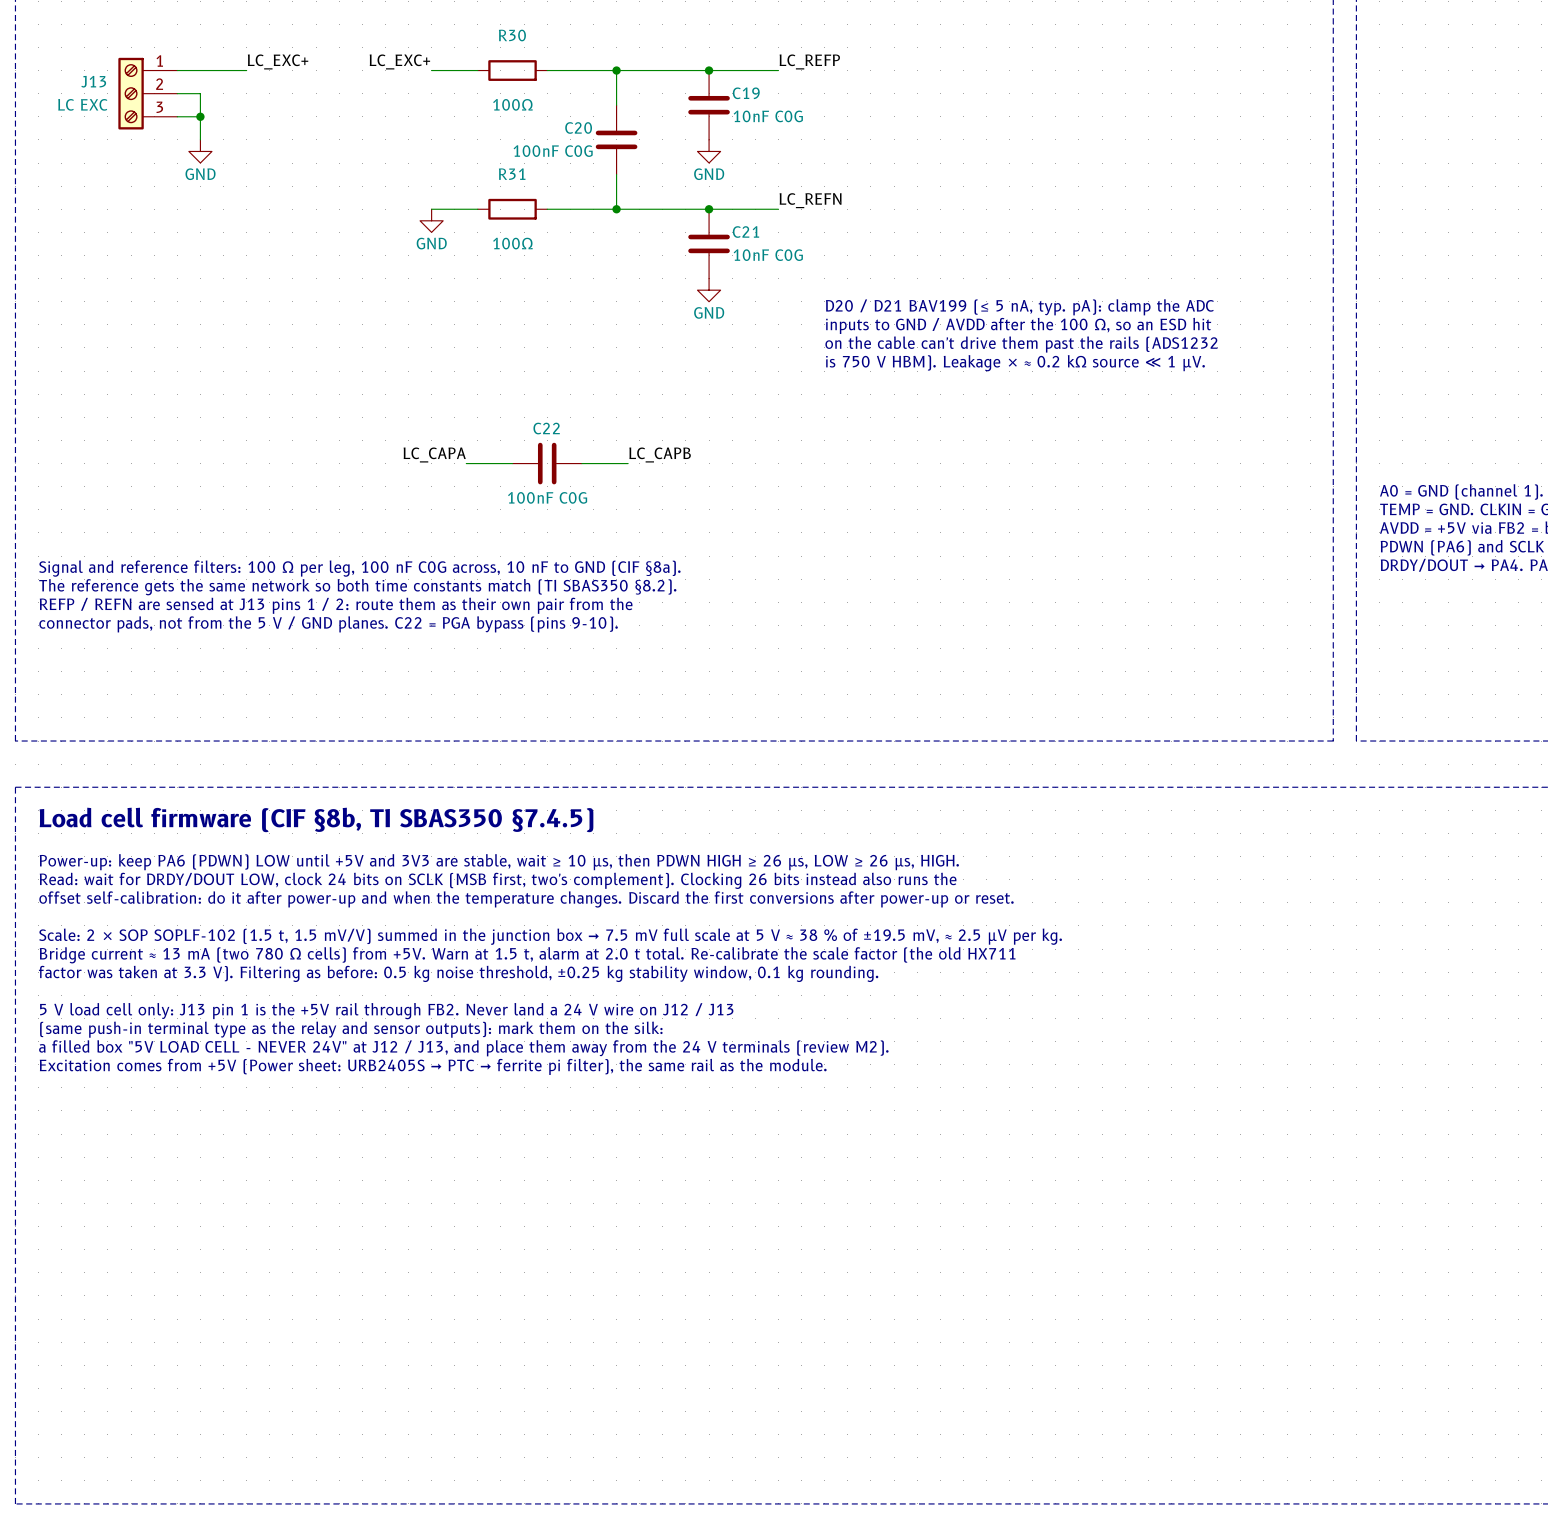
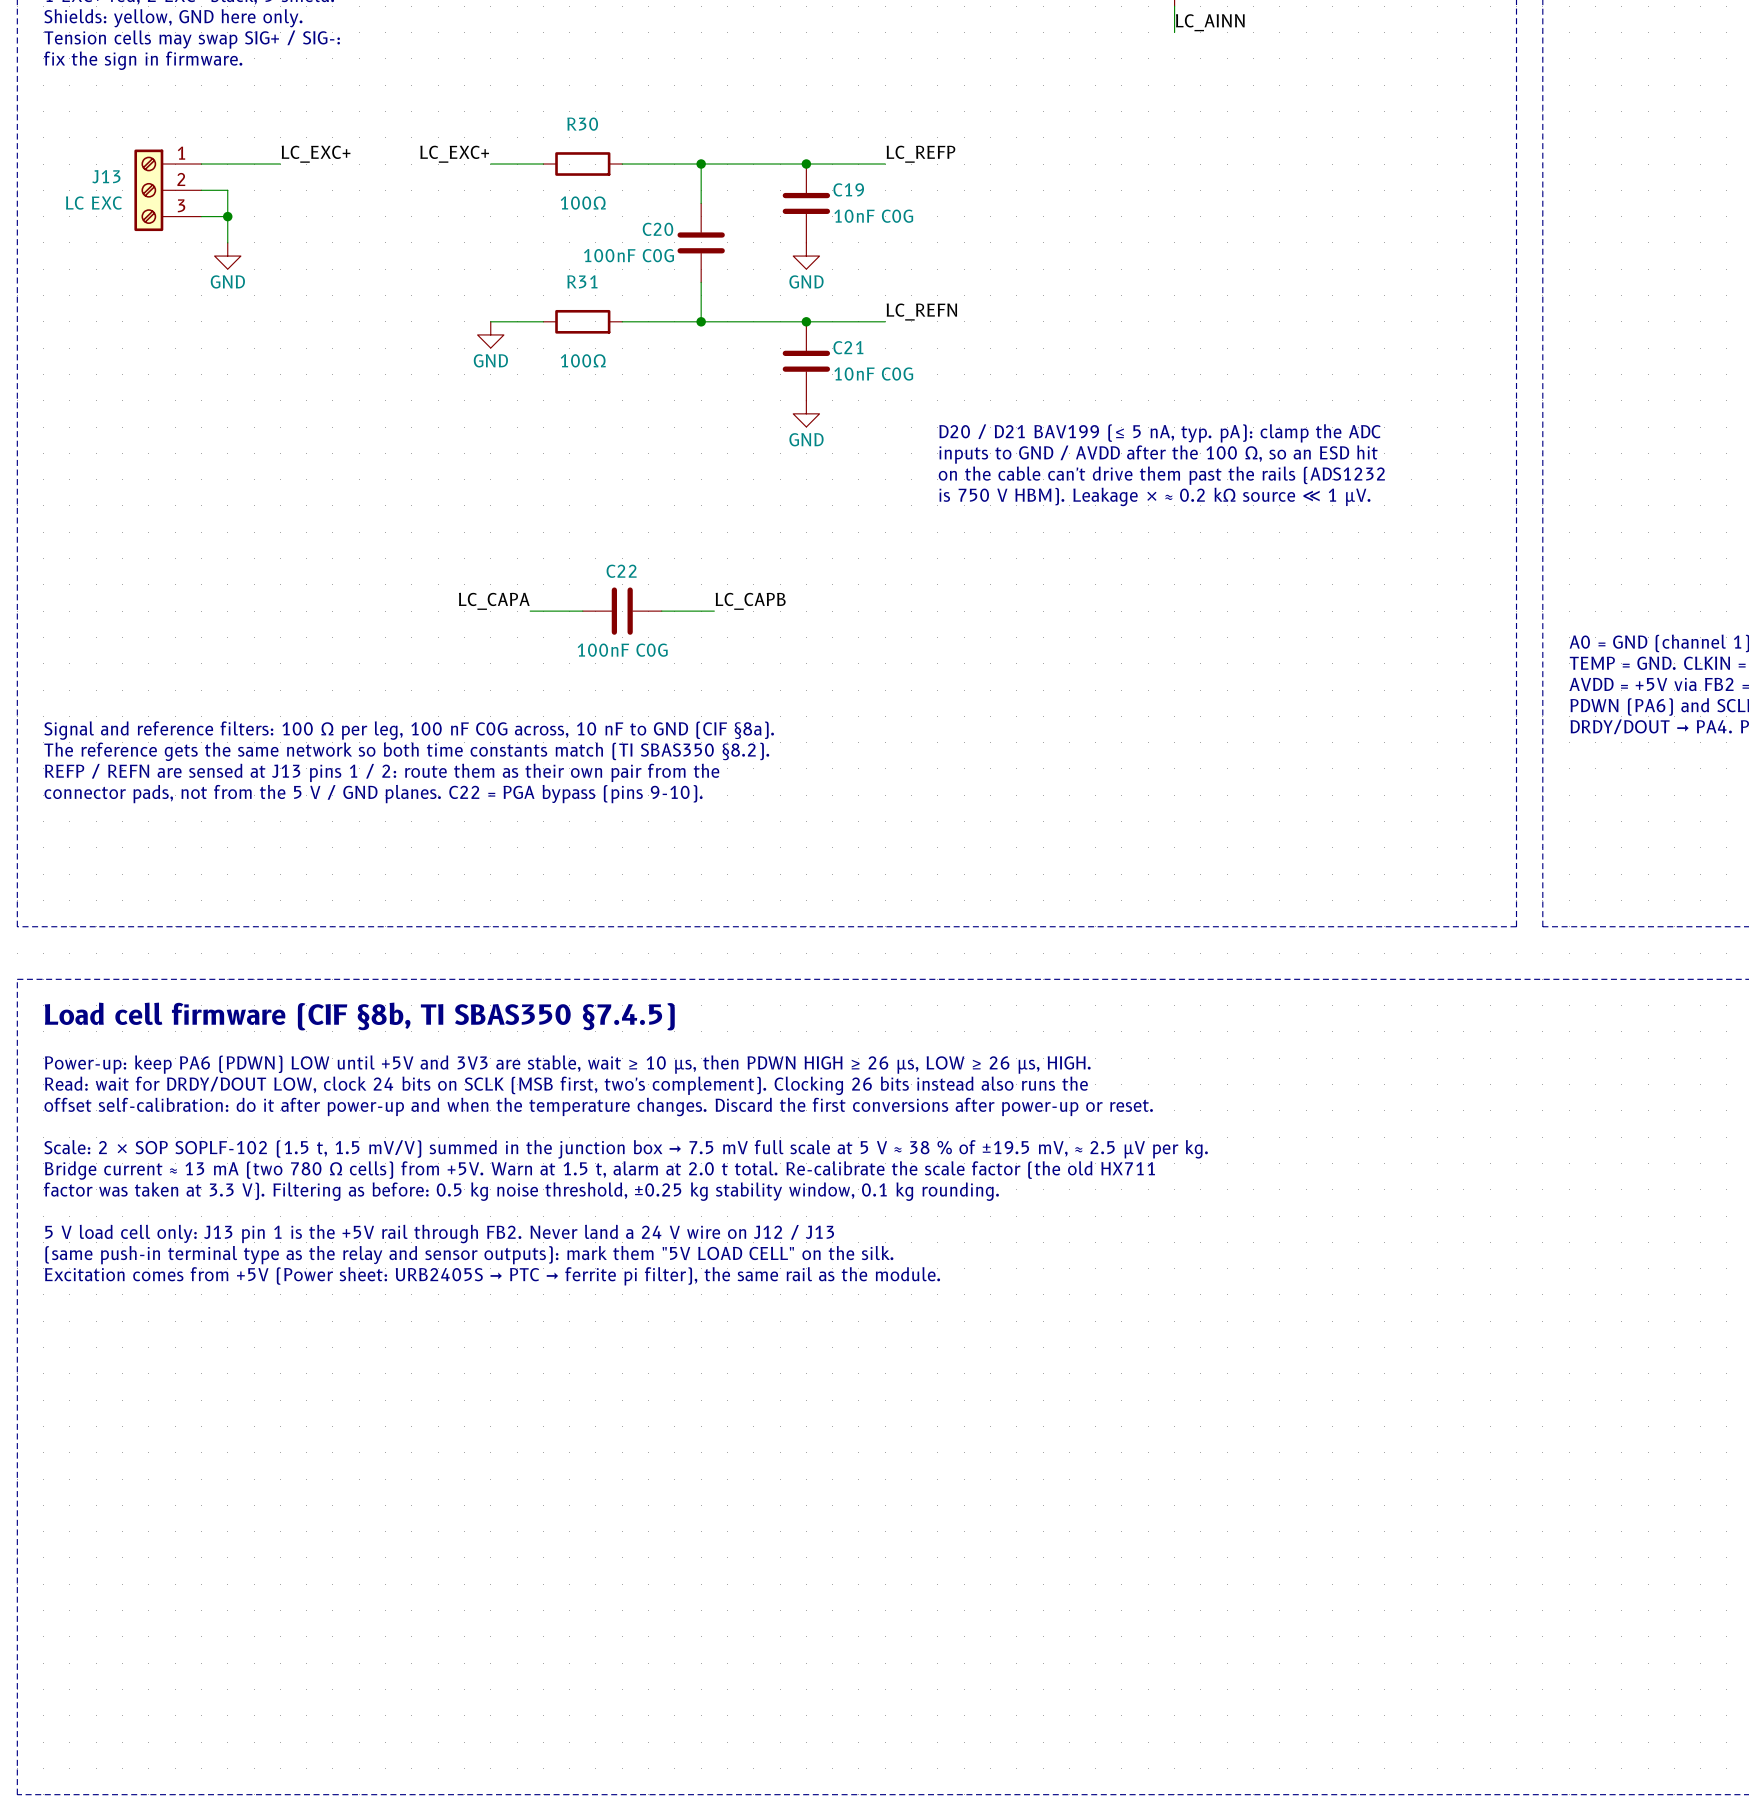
text: (same push-in terminal type as the relay and sensor outputs): mark them on the silk: (351, 1029) -> (same push-in terminal type as the relay and sensor outputs): mark them "5V LOAD CELL" on the silk. (469, 1255)
text: a filled box "5V LOAD CELL - NEVER 24V" at J12 / J13, and place them away from the 24 V terminals (review M2). (463, 1048) -> Excitation comes from +5V (Power sheet: URB2405S → PTC → ferrite pi filter), the same rail as the module. (492, 1276)
text: Excitation comes from +5V (Power sheet: URB2405S → PTC → ferrite pi filter), the same rail as the module. (433, 1066) -> none

